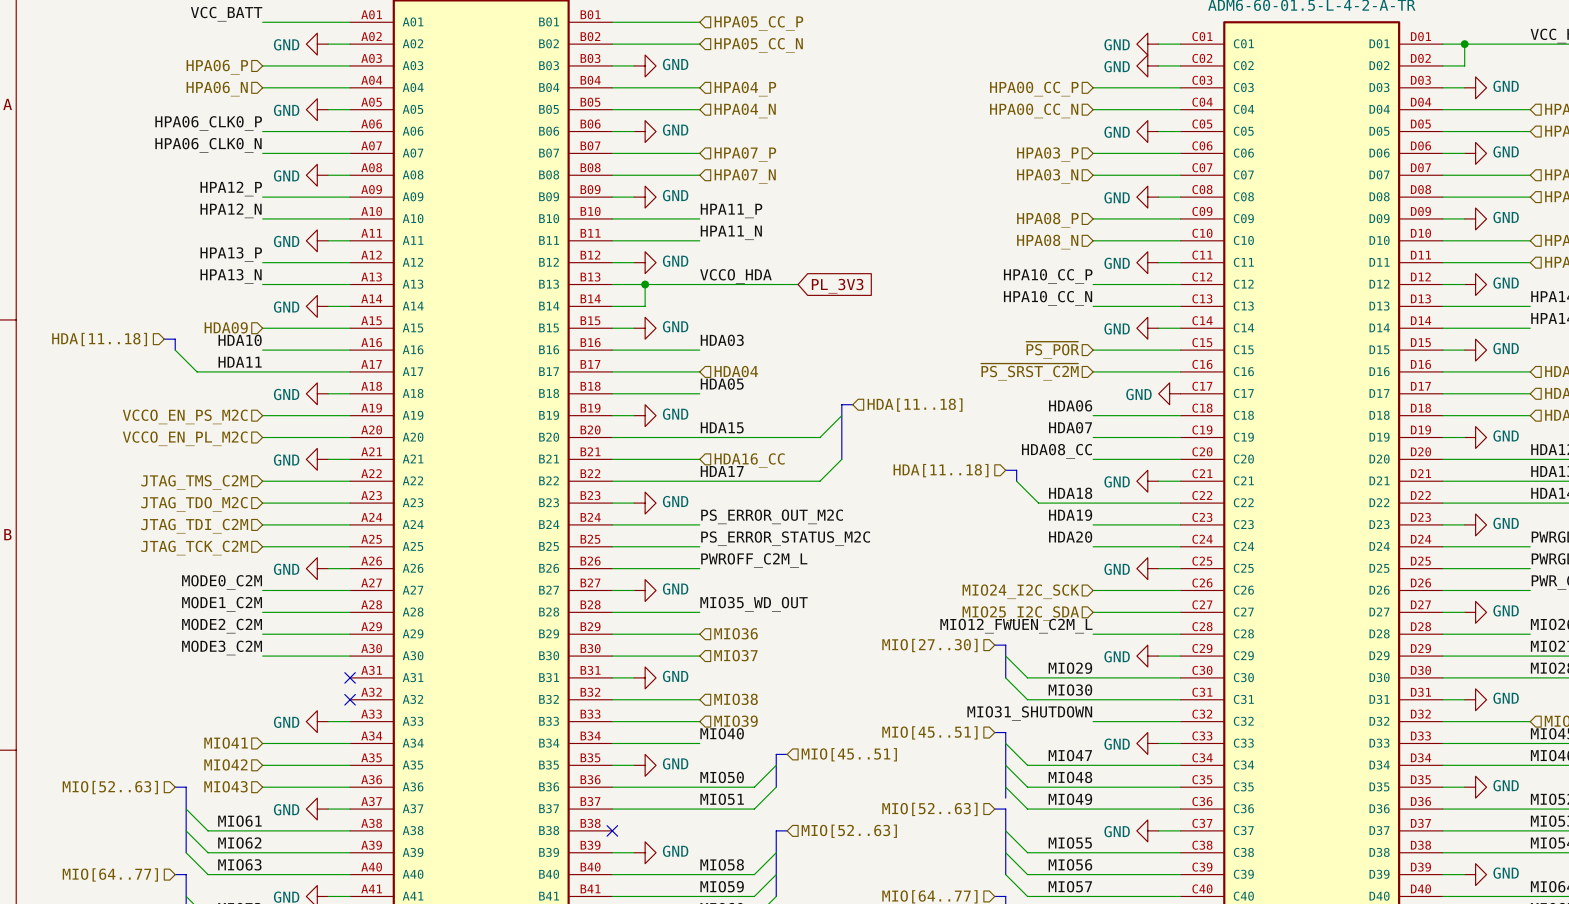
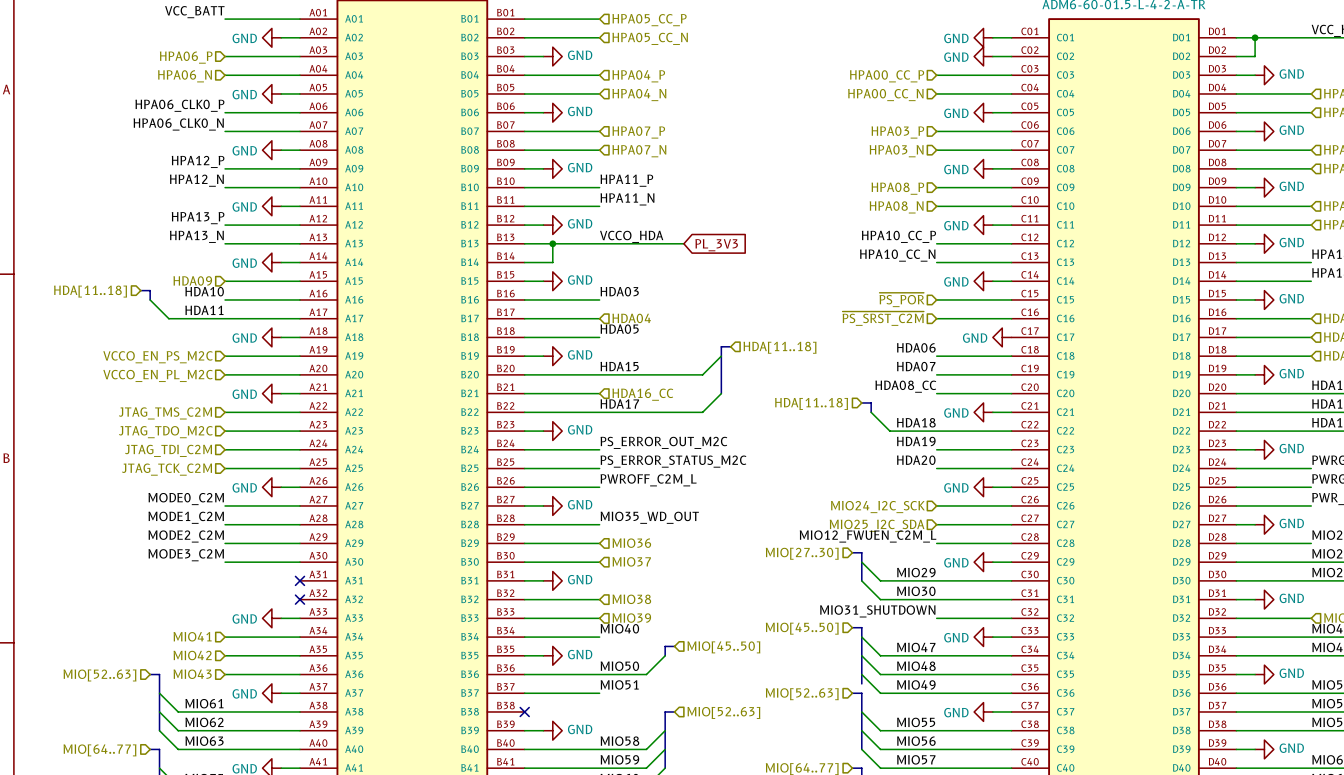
hierarchical label: MIO[45..51] (929, 732) -> MIO[45..50] (802, 628)
hierarchical label: MIO[45..51] (849, 754) -> MIO[45..50] (723, 647)
bus: (776, 765) (776, 787) -> none
wire: (776, 787) (754, 809) (699, 809) -> none

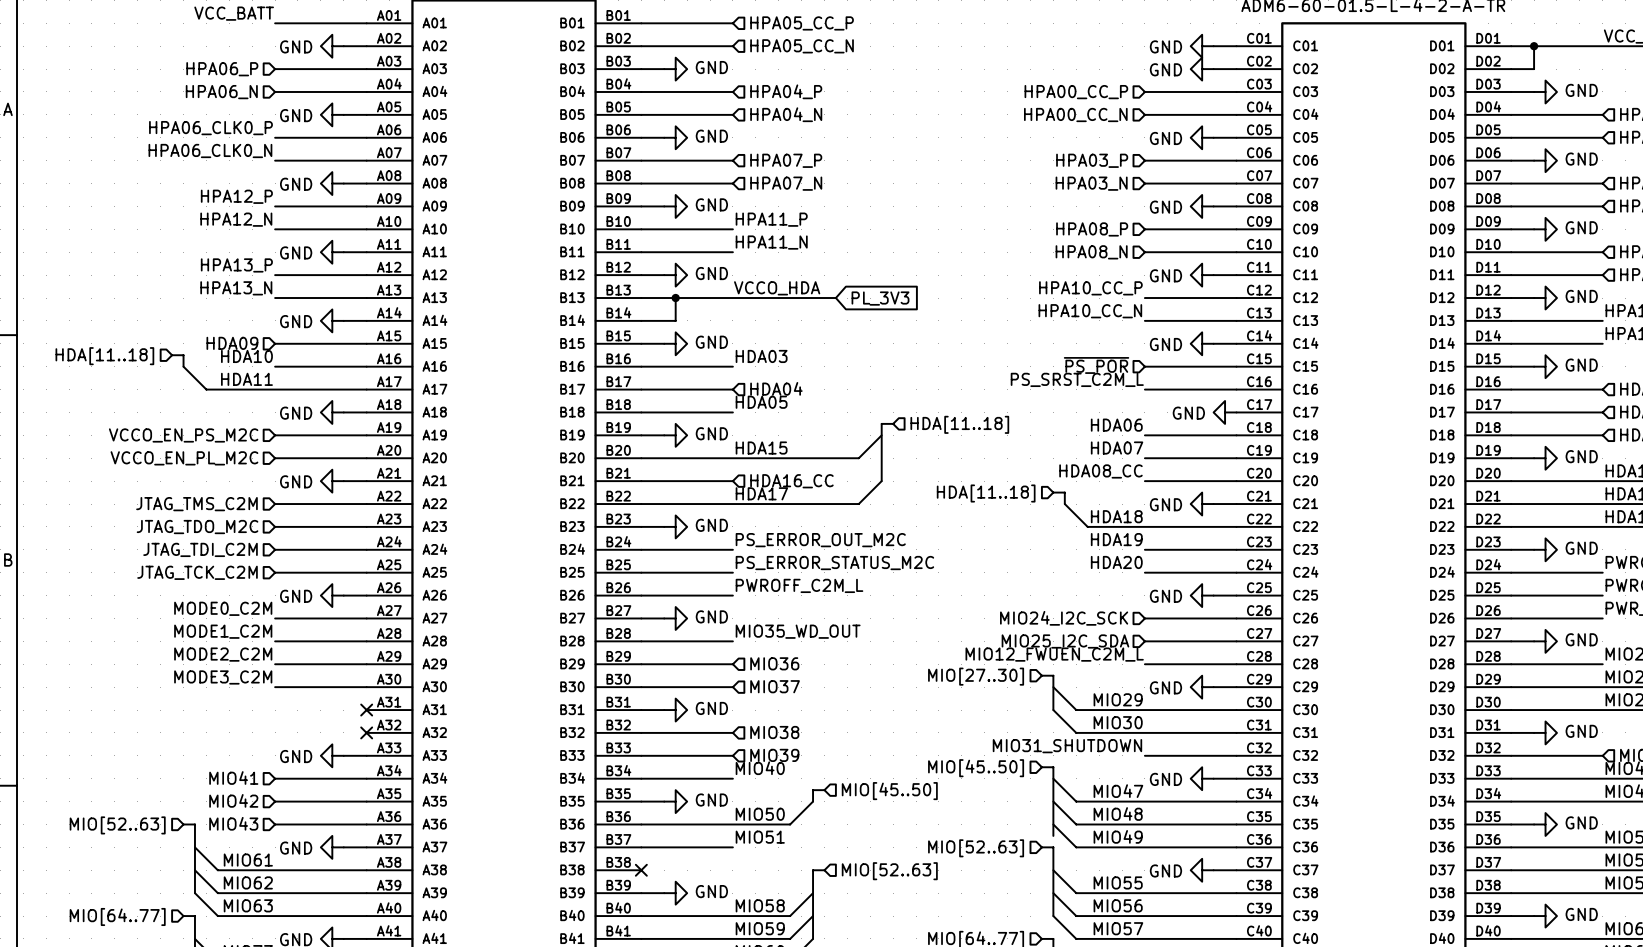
label: none -> PS_SRST_C2M_L (1077, 379)
hierarchical label: ~{PS_SRST_C2M} (883, 318) -> none

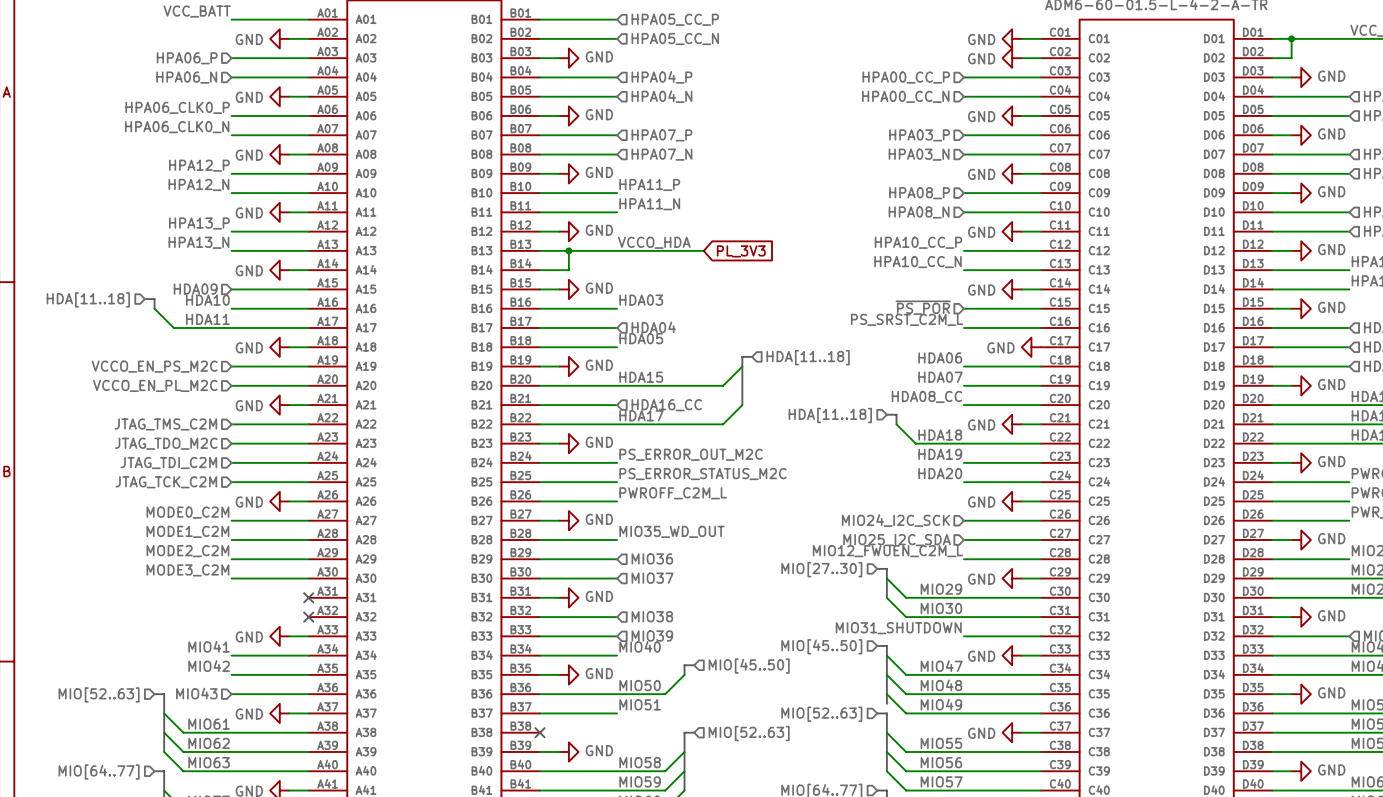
label: none -> MIO41 (209, 646)
hierarchical label: MIO41 (233, 778) -> none
label: none -> MIO42 (209, 666)
hierarchical label: MIO42 (233, 800) -> none

